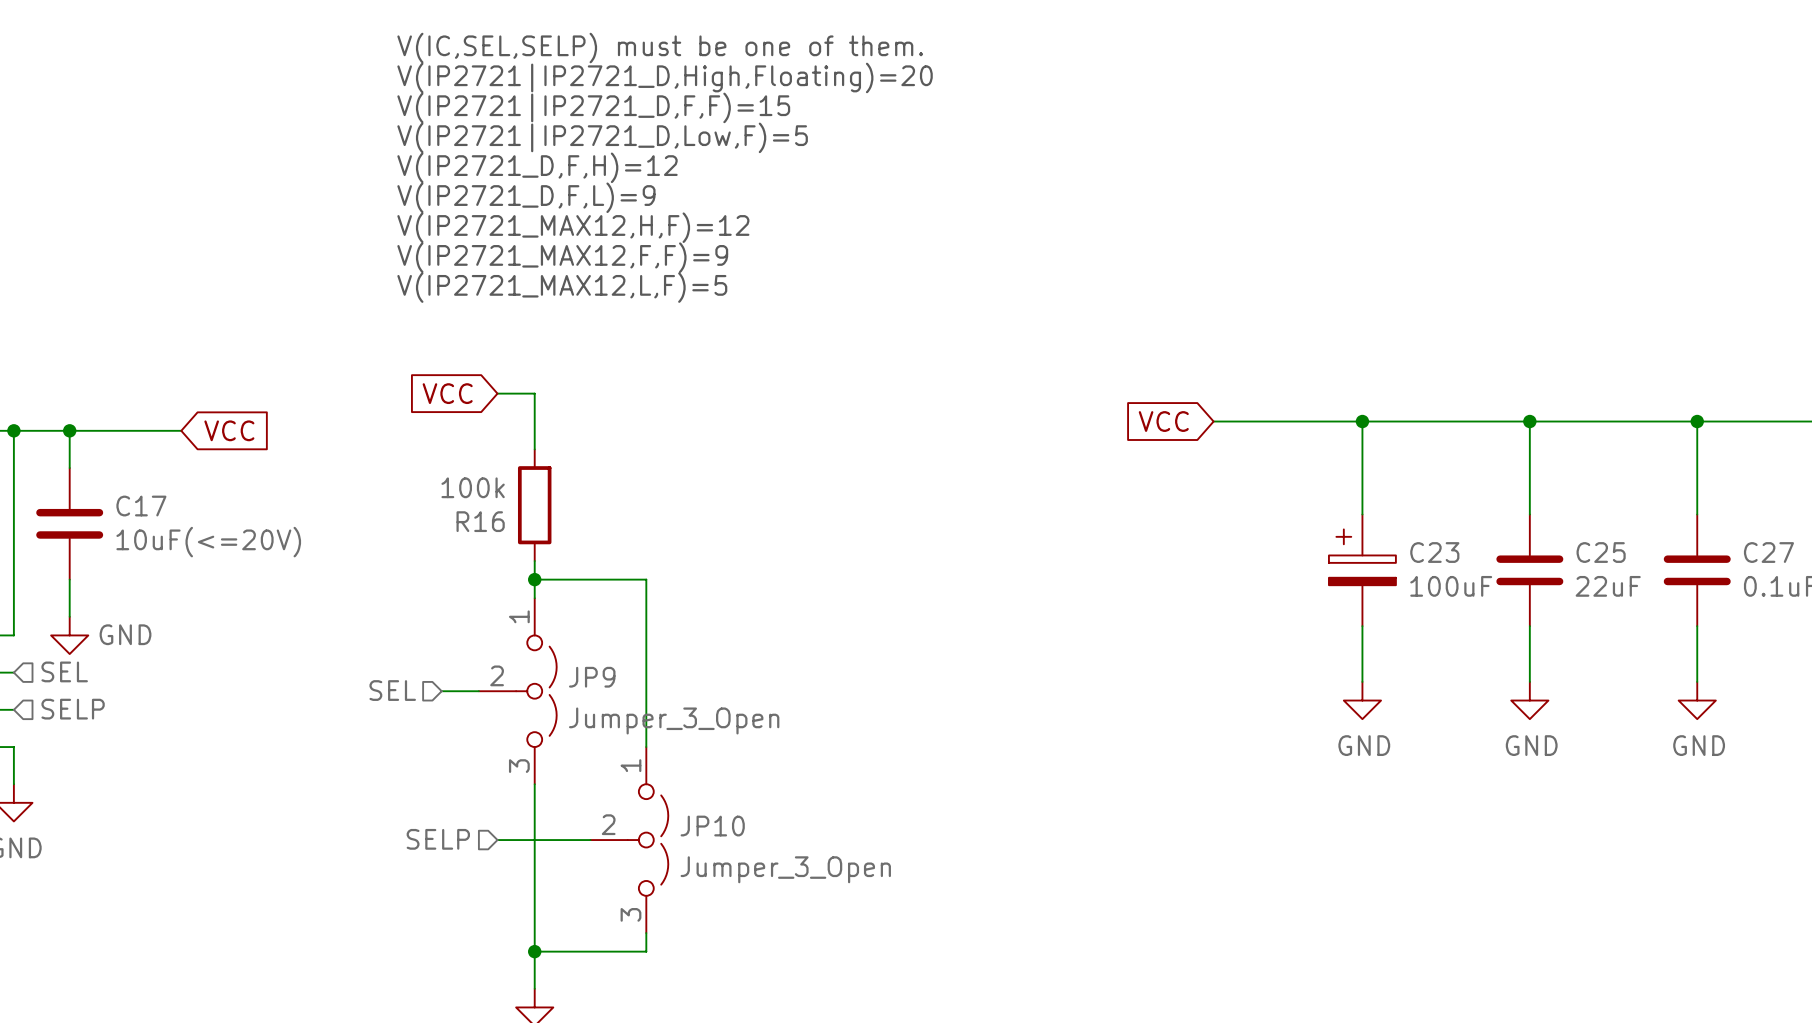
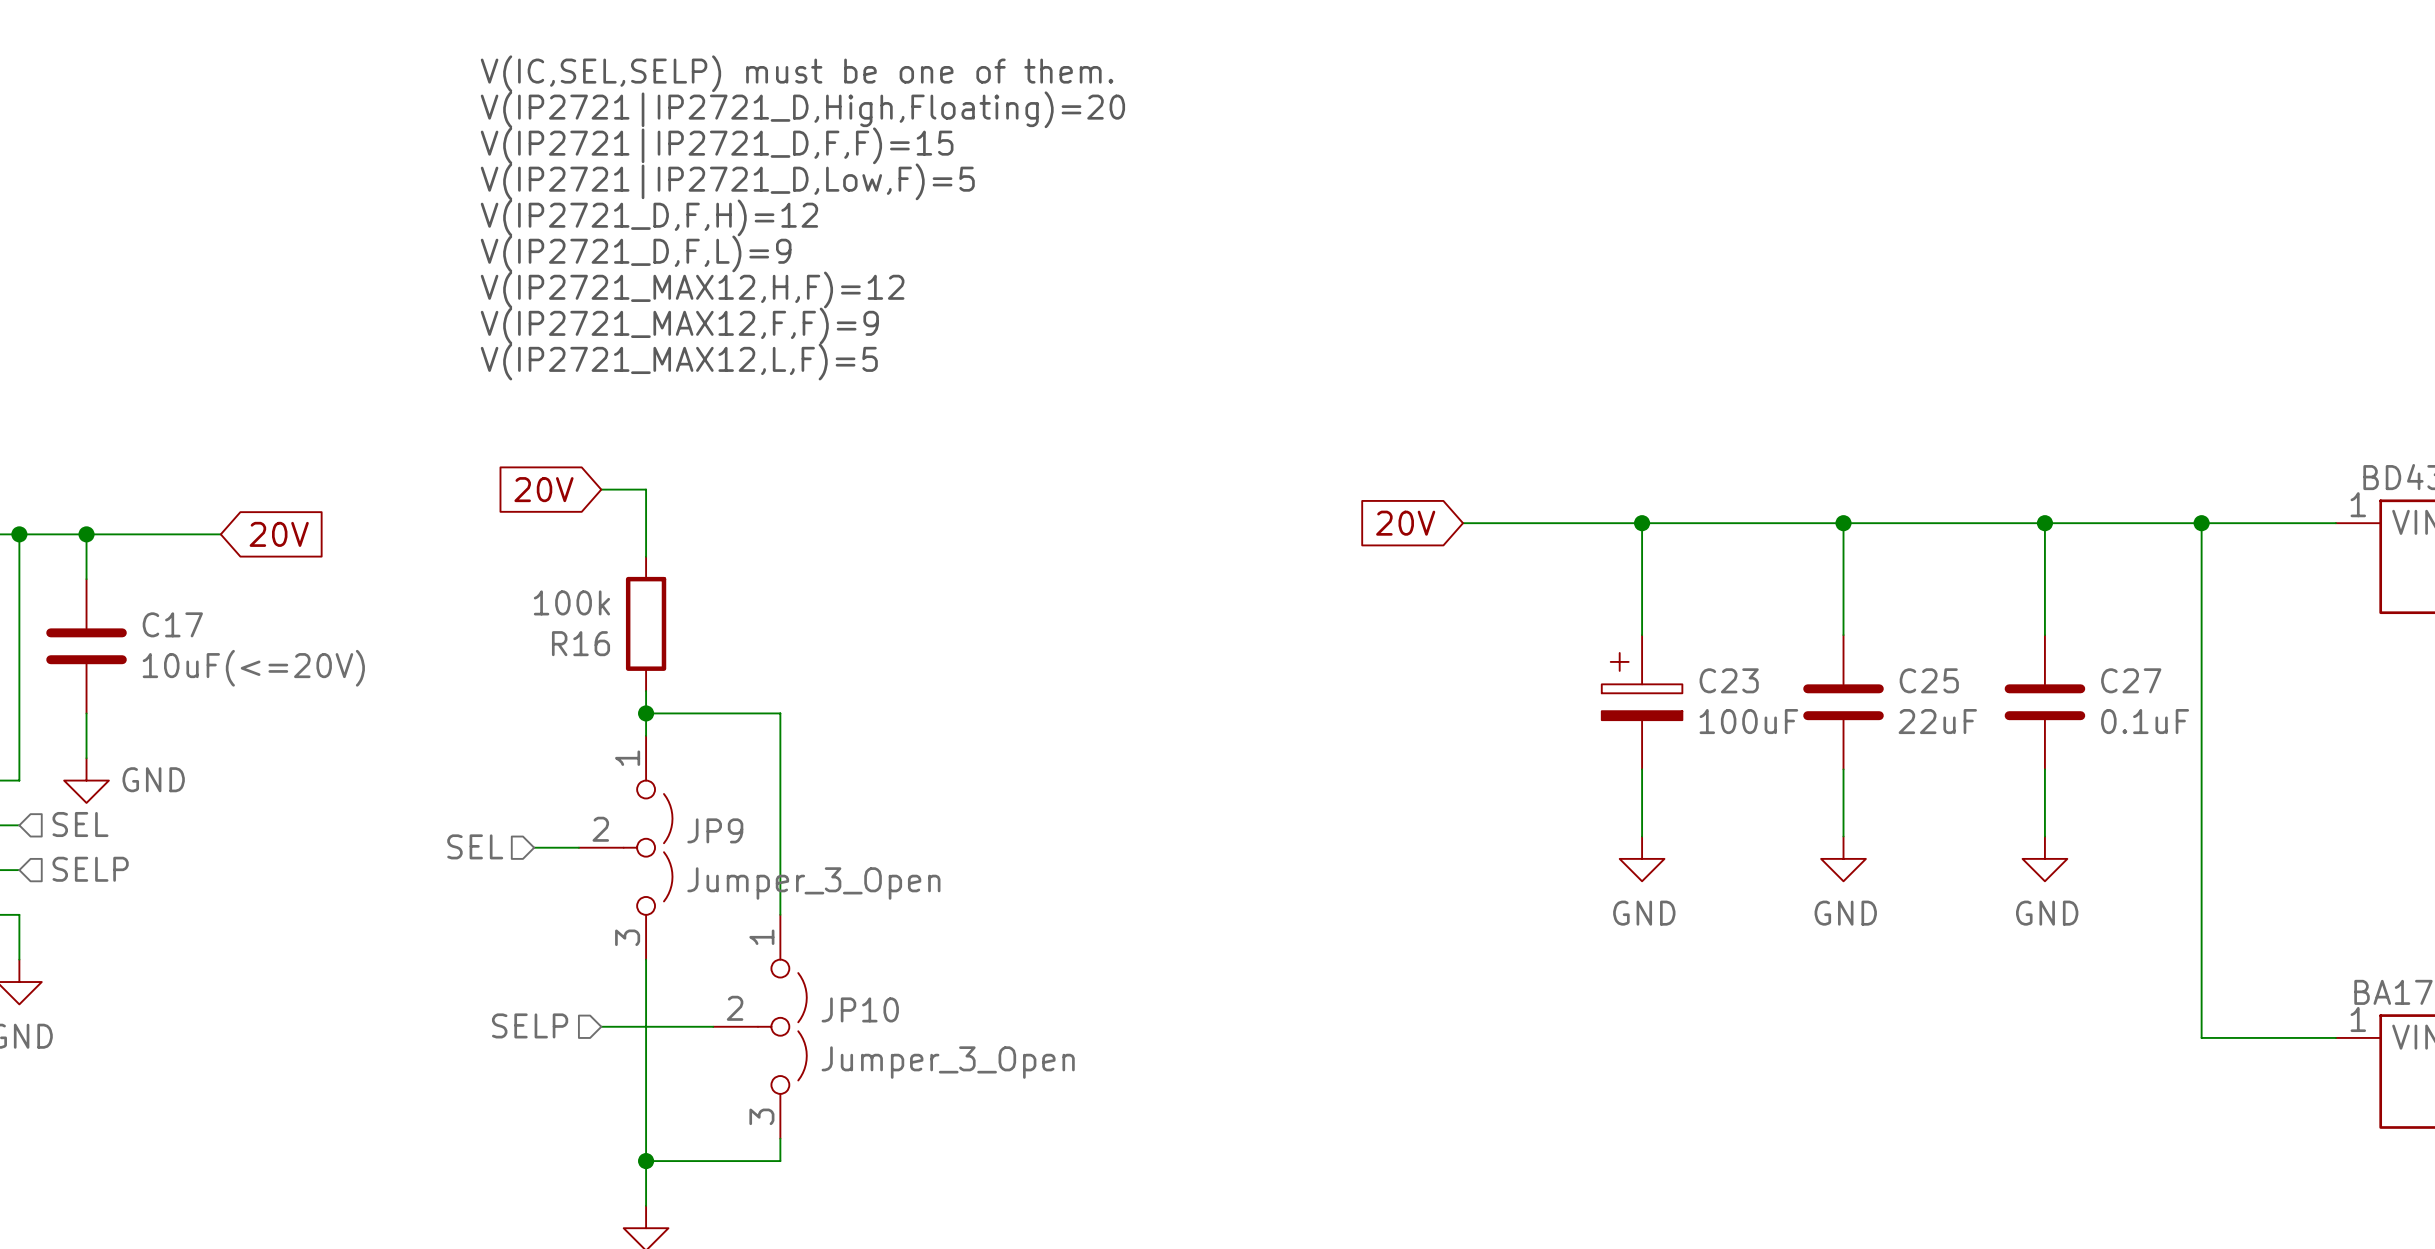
global label: VCC (447, 393) -> 20V (543, 489)
global label: VCC (1163, 421) -> 20V (1405, 523)
global label: VCC (229, 430) -> 20V (279, 534)

